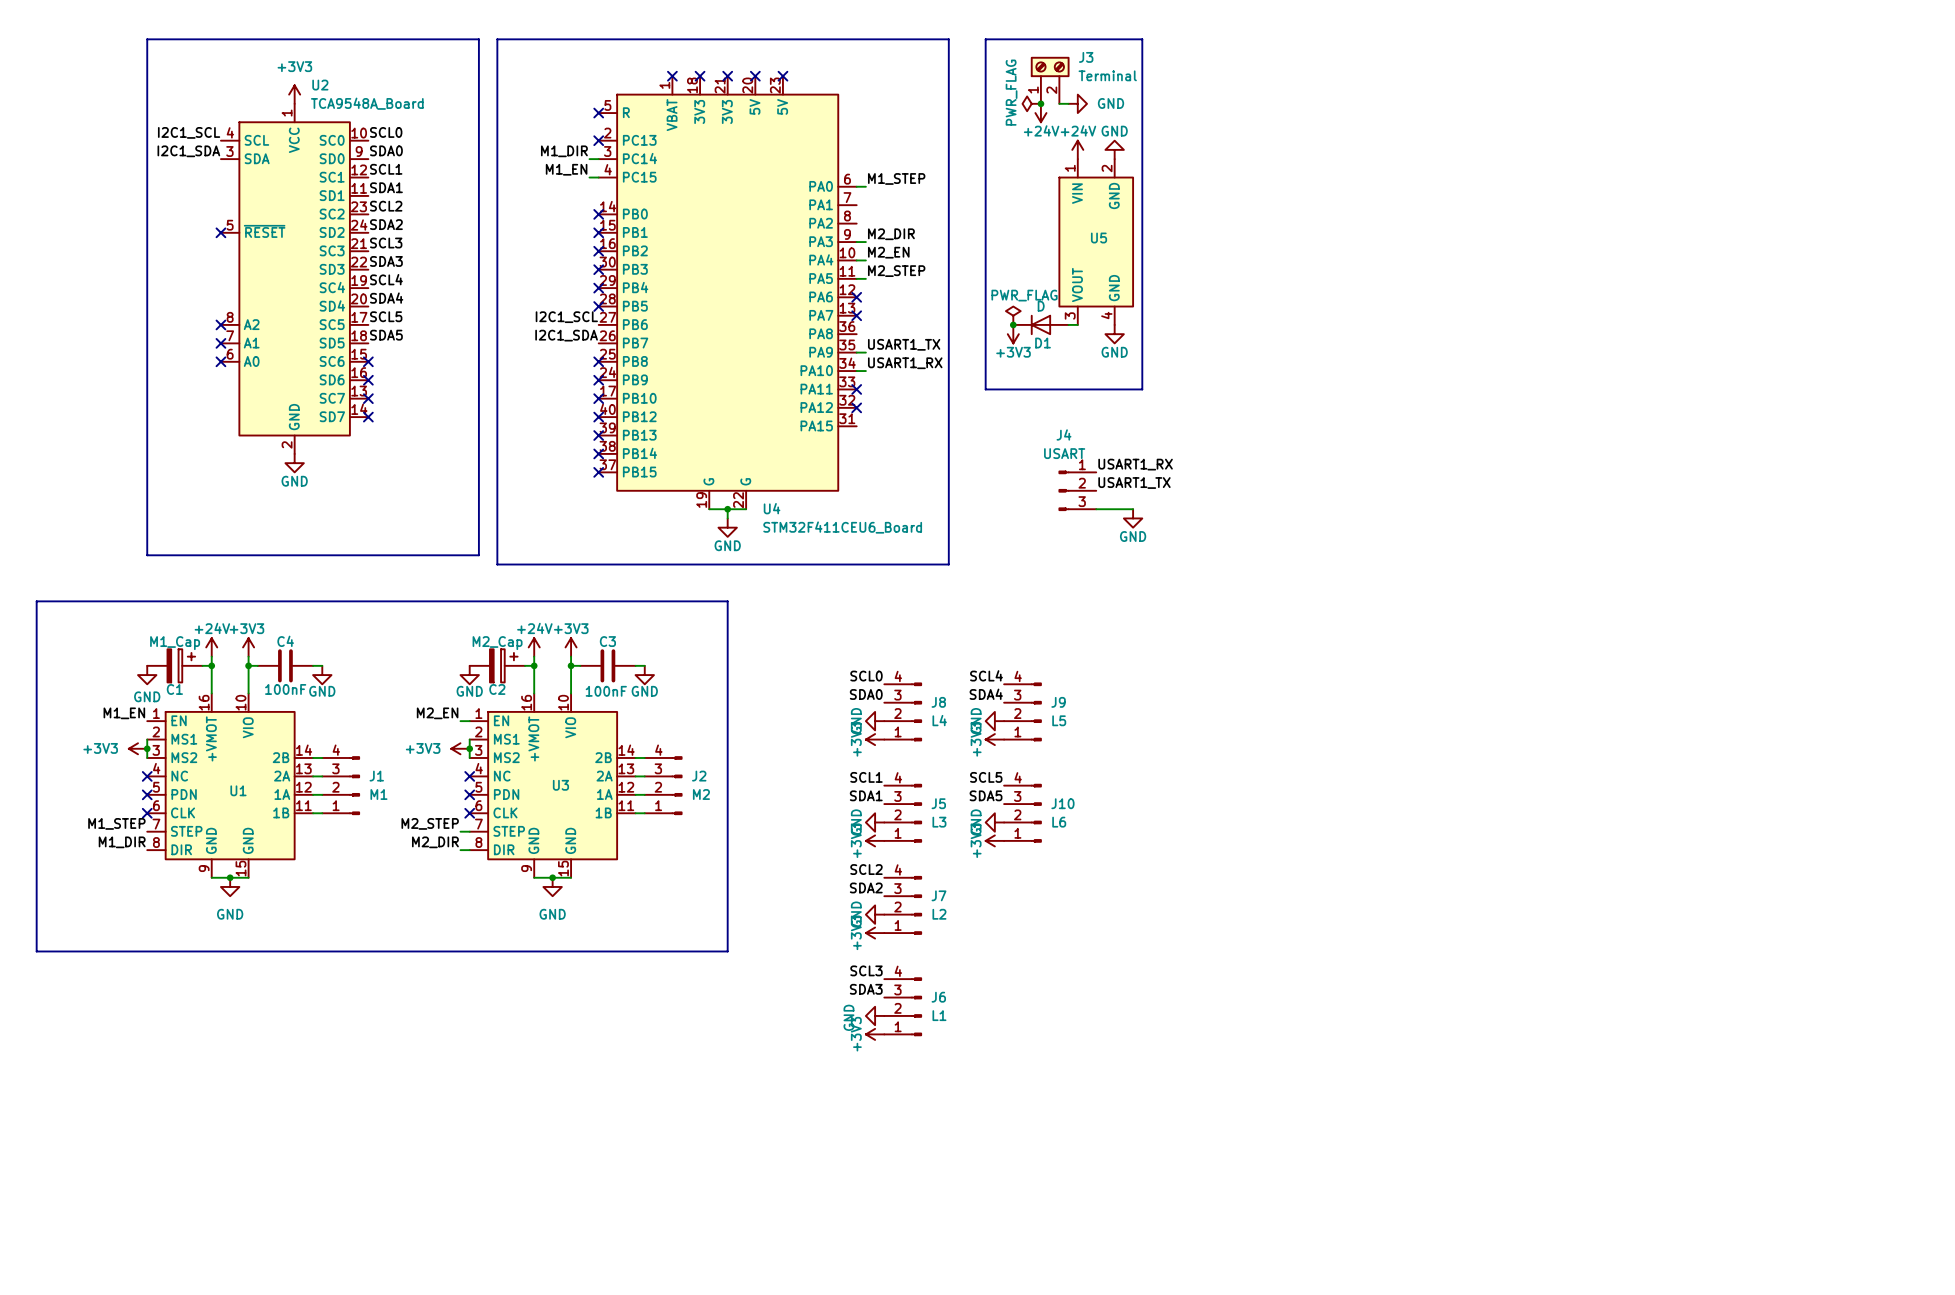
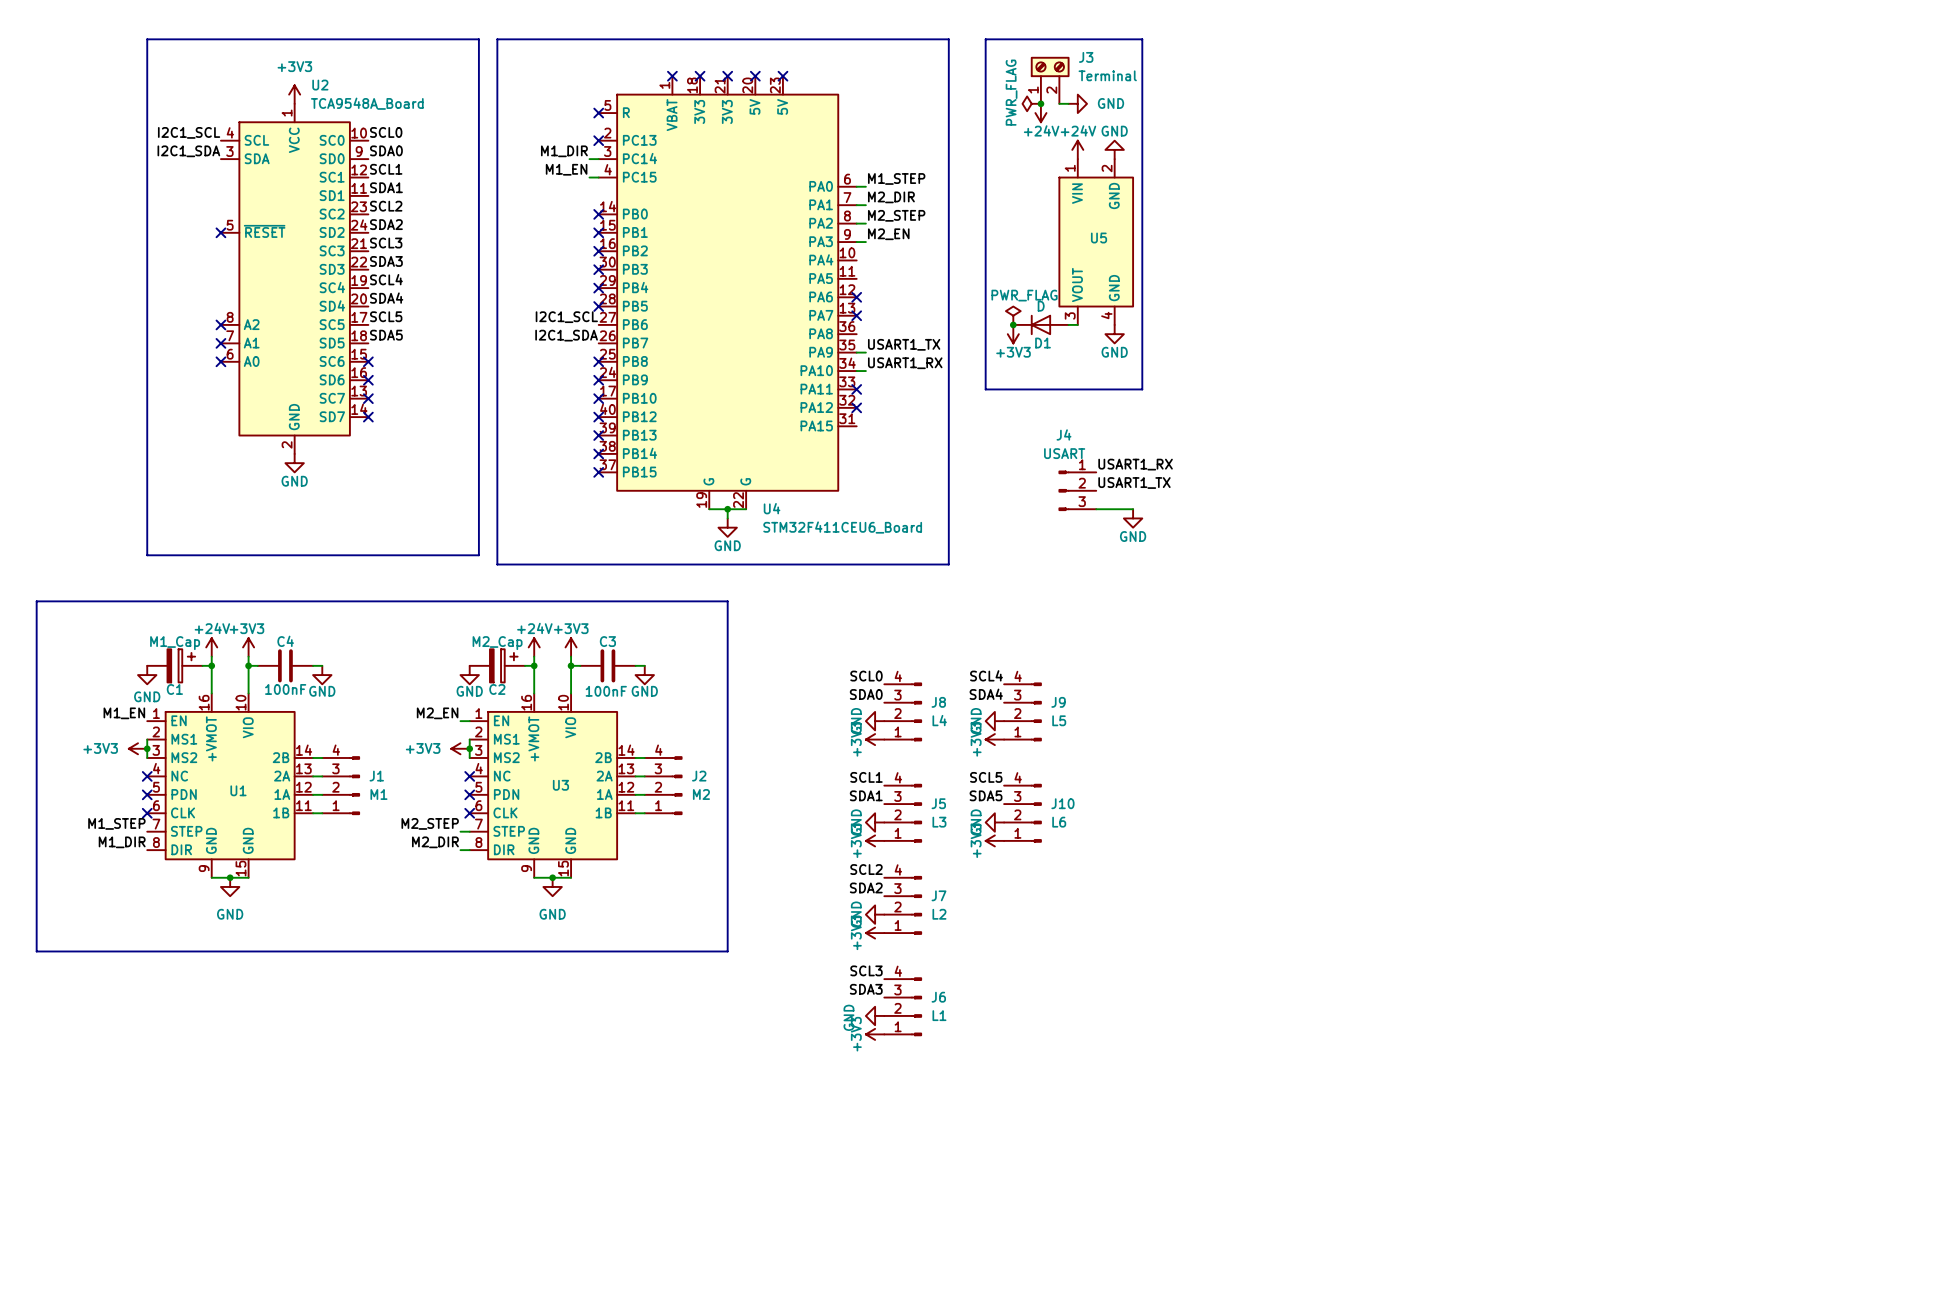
label: none -> M2_DIR (891, 197)
label: M2_DIR (891, 234) -> M2_EN (888, 234)
label: M2_EN (888, 252) -> none
wire: (856, 260) (865, 260) -> (856, 223) (865, 223)
label position: M2_STEP (896, 271) -> M2_STEP (896, 215)
wire: (856, 278) (865, 278) -> (856, 205) (865, 205)

